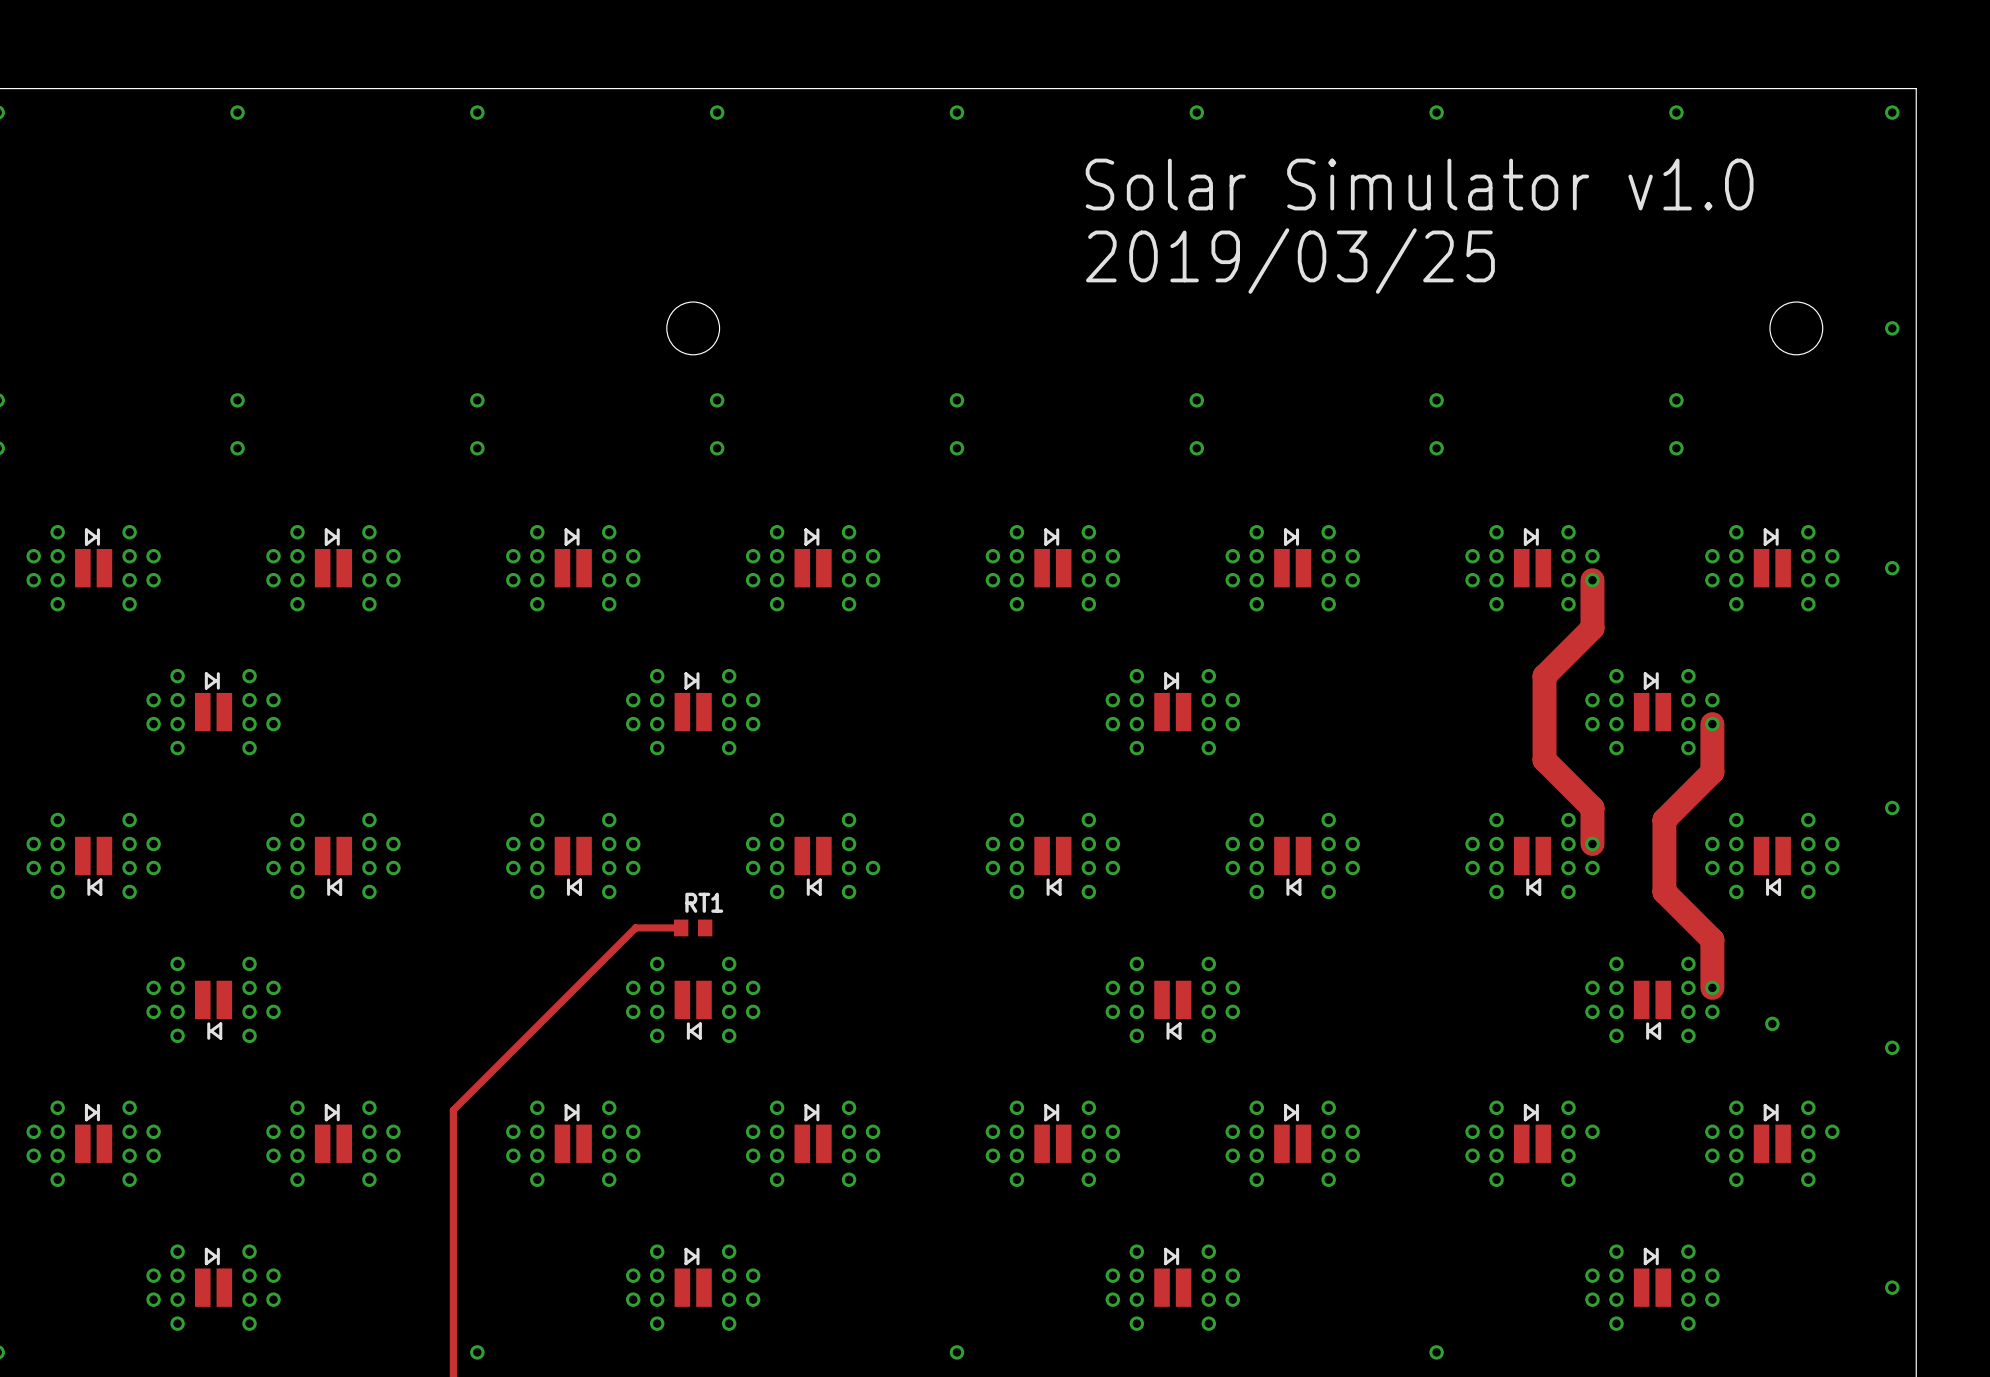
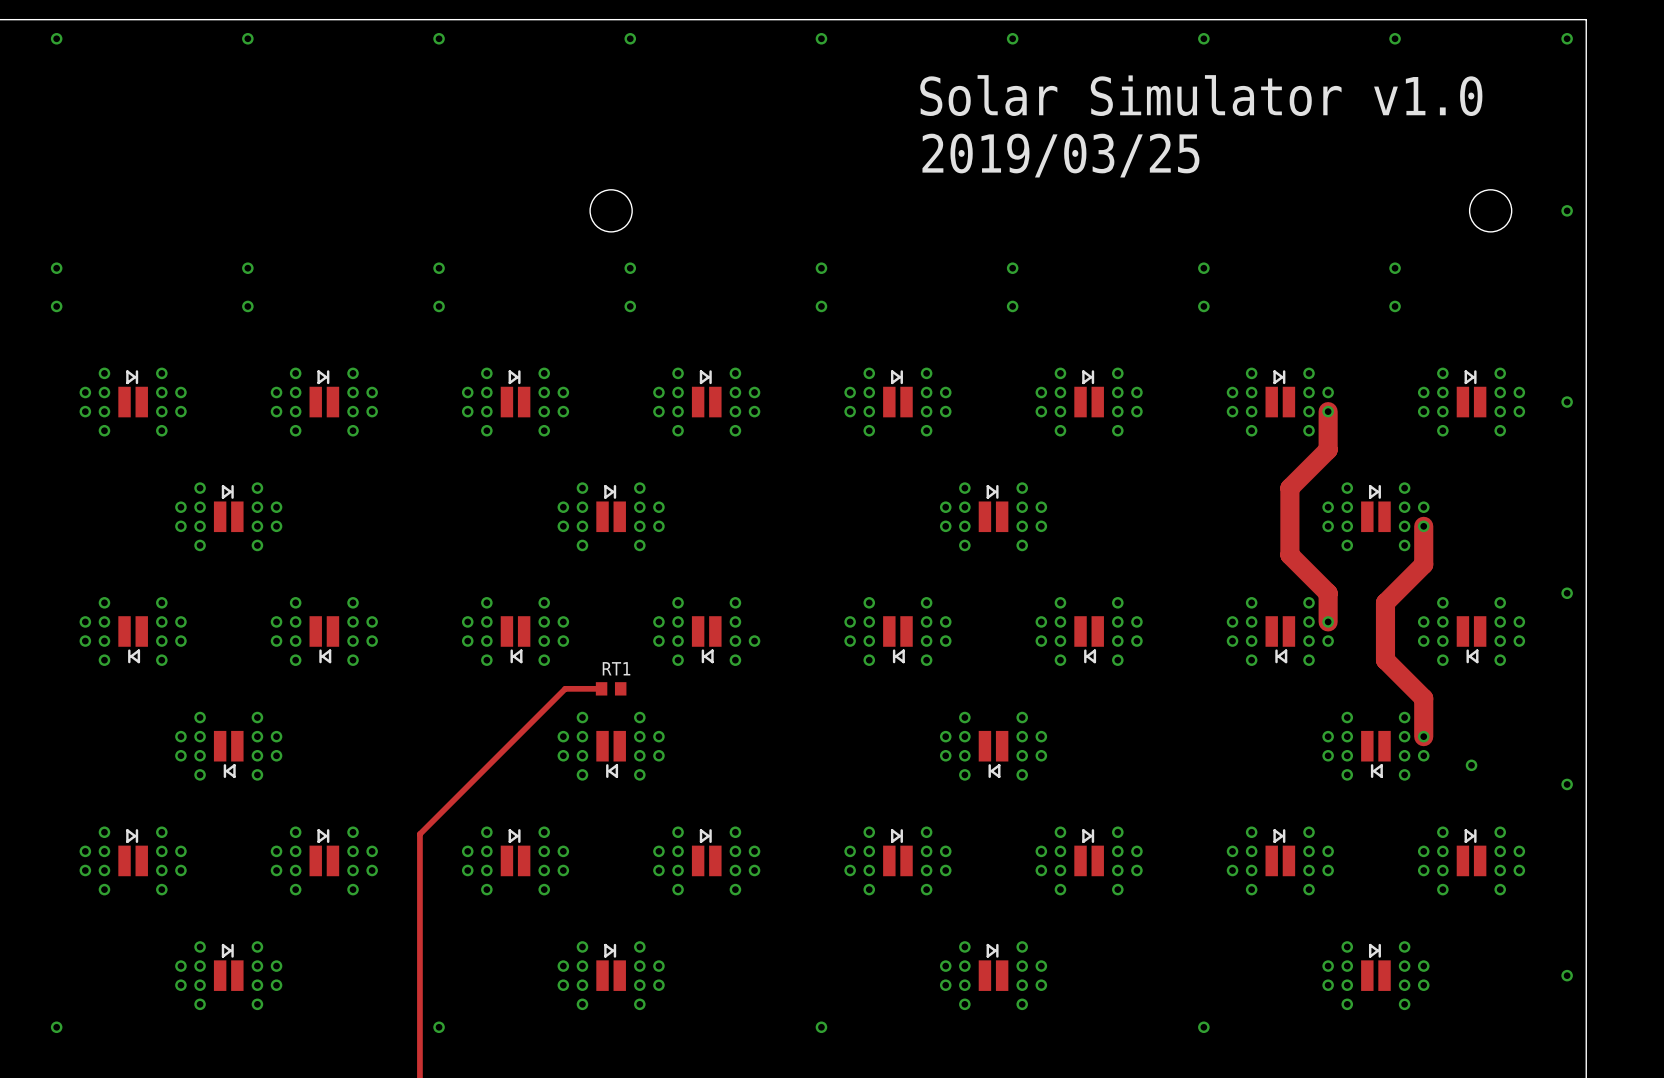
via: none -> (1328, 870)
via: none -> (1519, 870)

